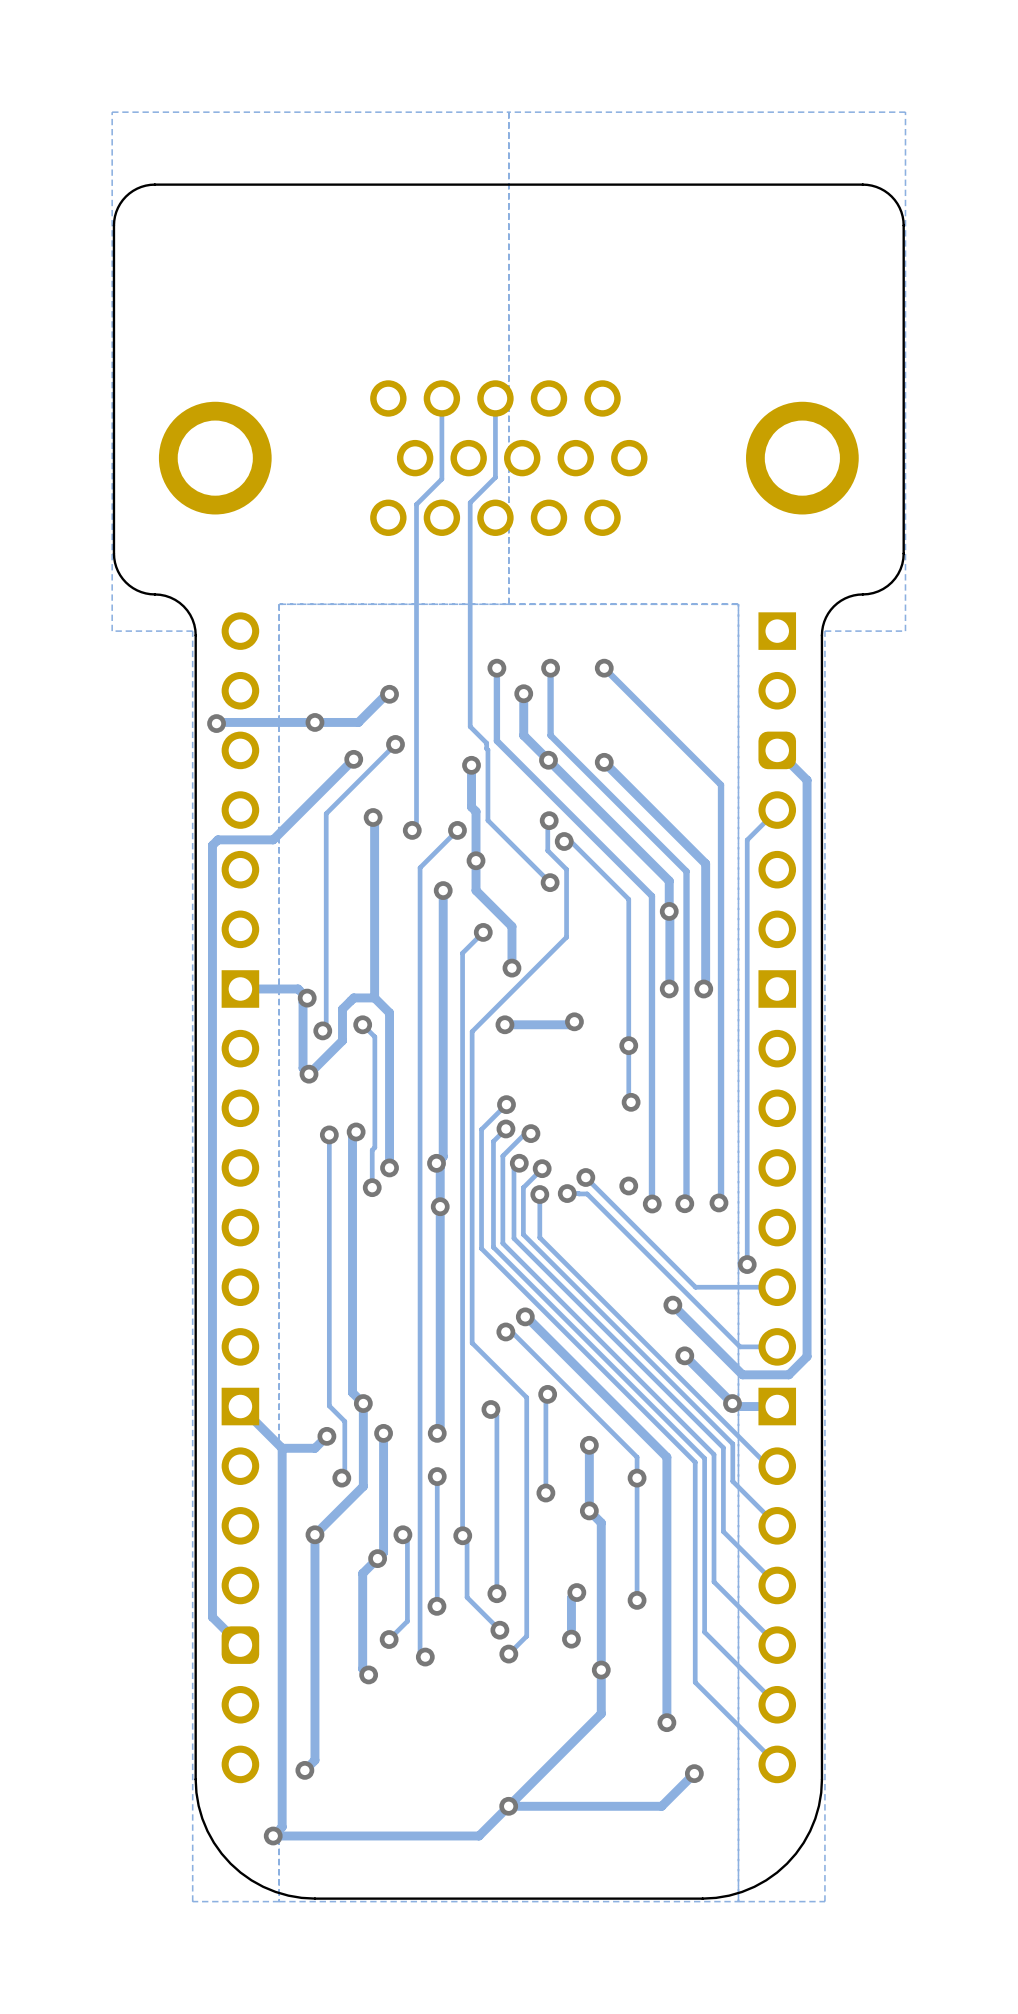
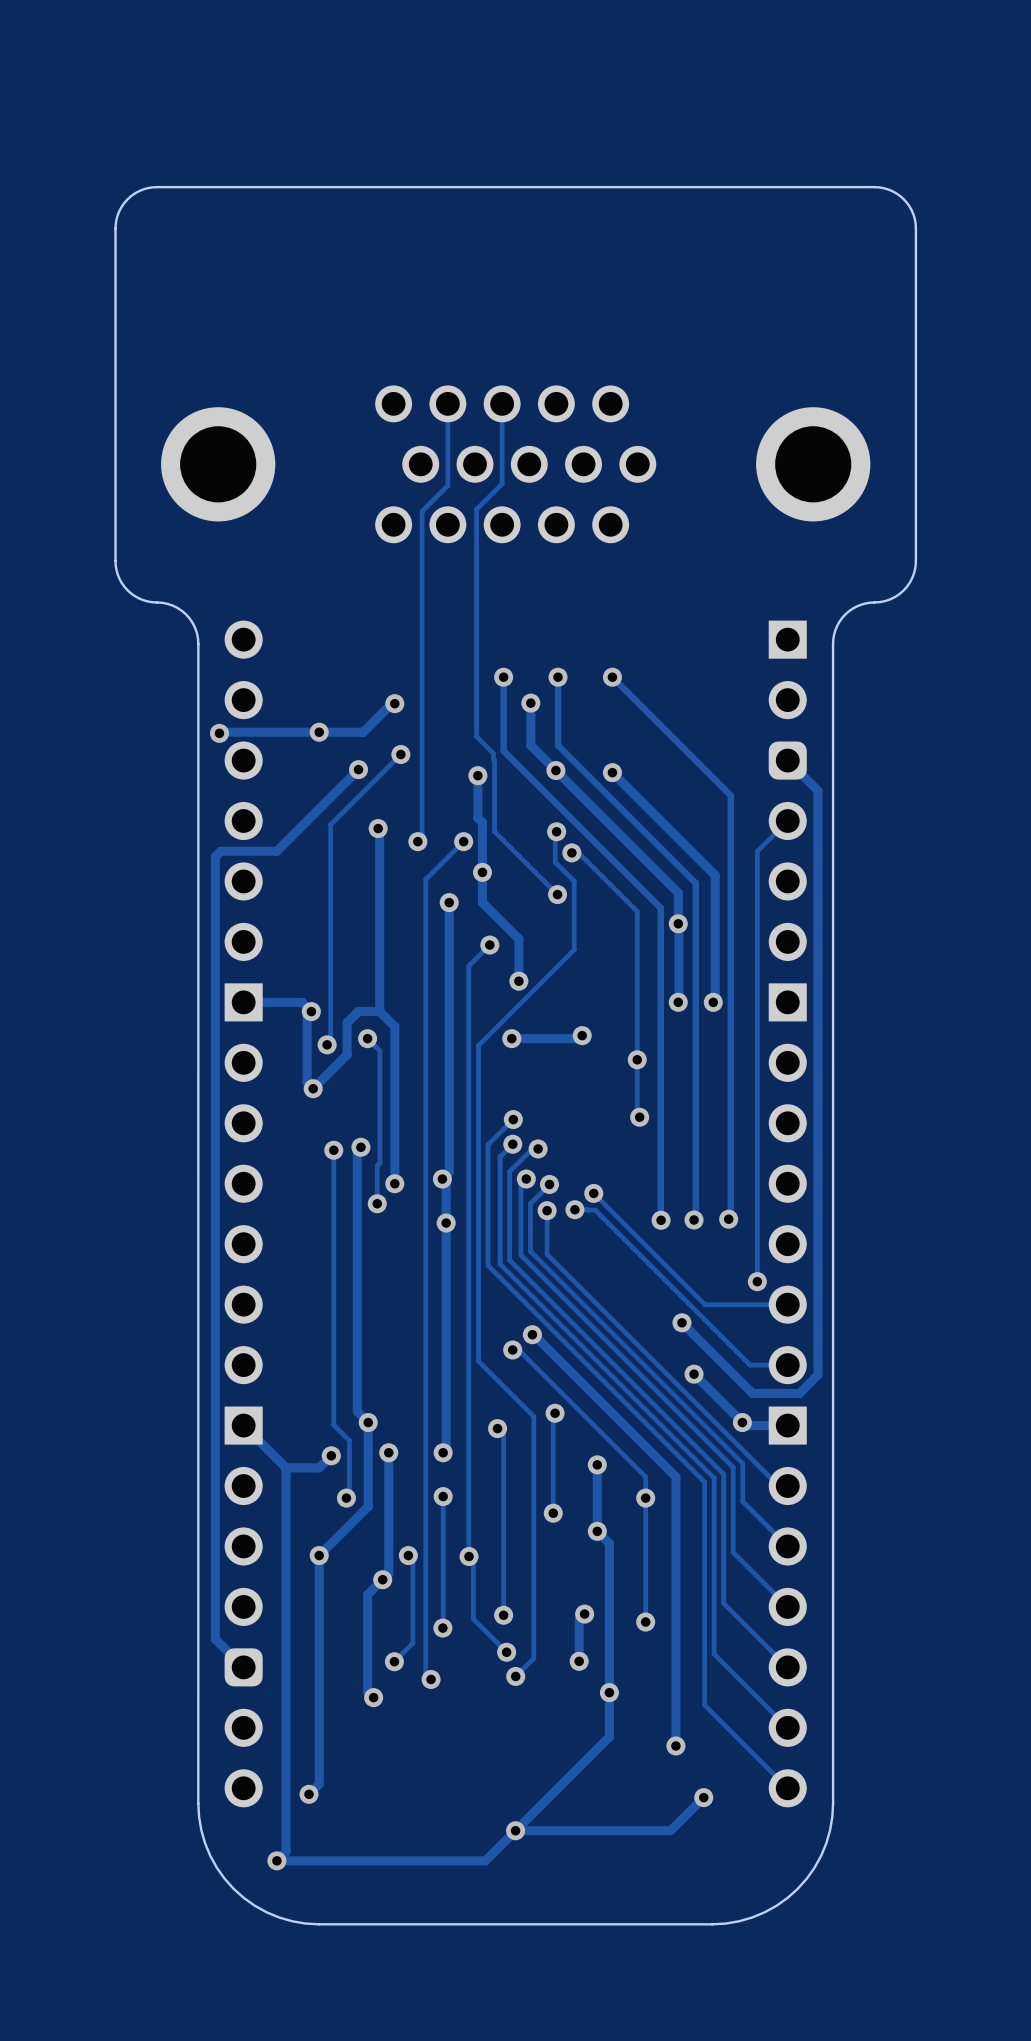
zone outline: (508, 112) (508, 604) -> none
zone outline: (905, 112) (112, 112) (112, 631) (192, 631) (192, 1901) (824, 1901) (824, 631) (905, 631) (905, 112) -> none
via: (628, 1185) -> none
zone outline: (738, 1901) (738, 604) (279, 604) (279, 1901) -> none

